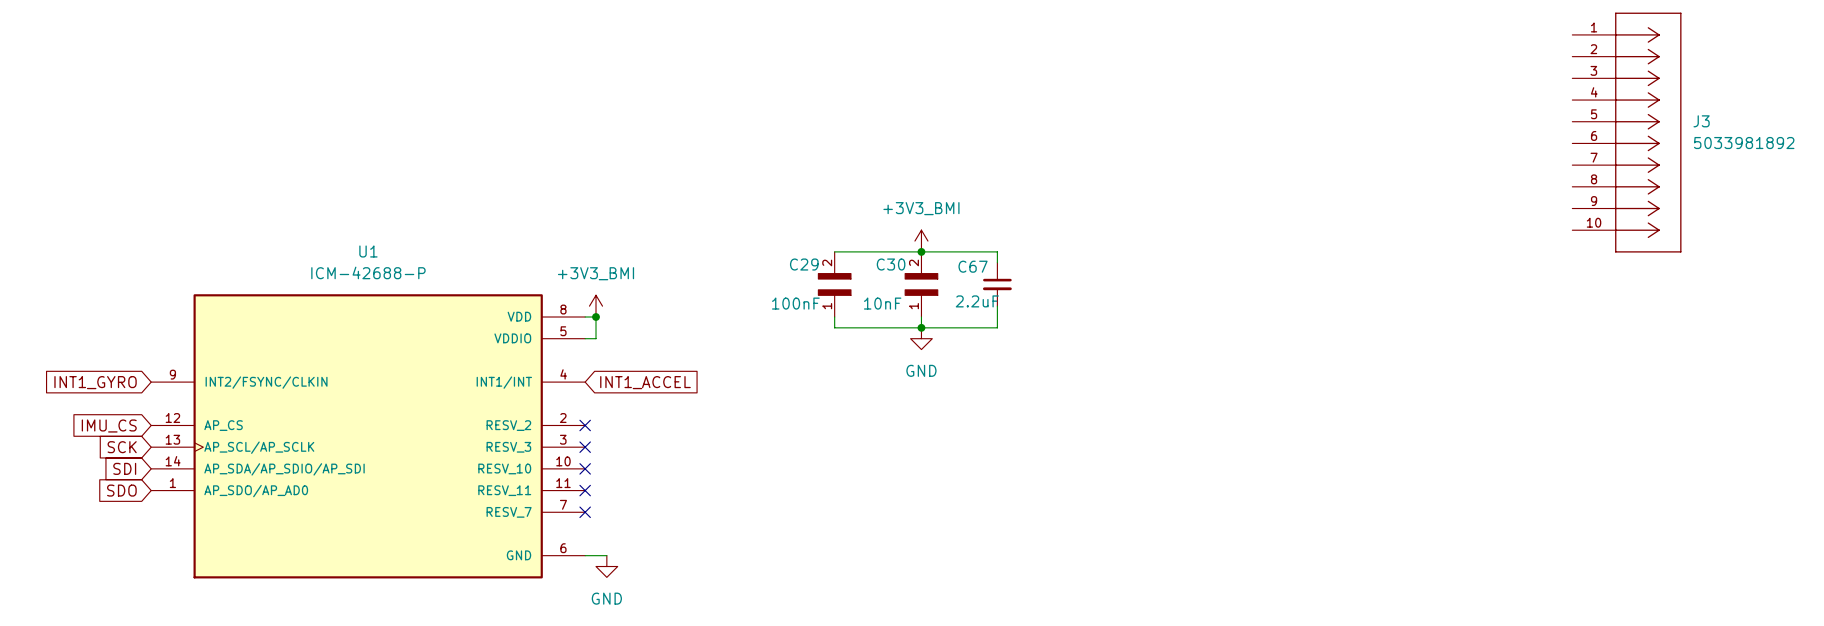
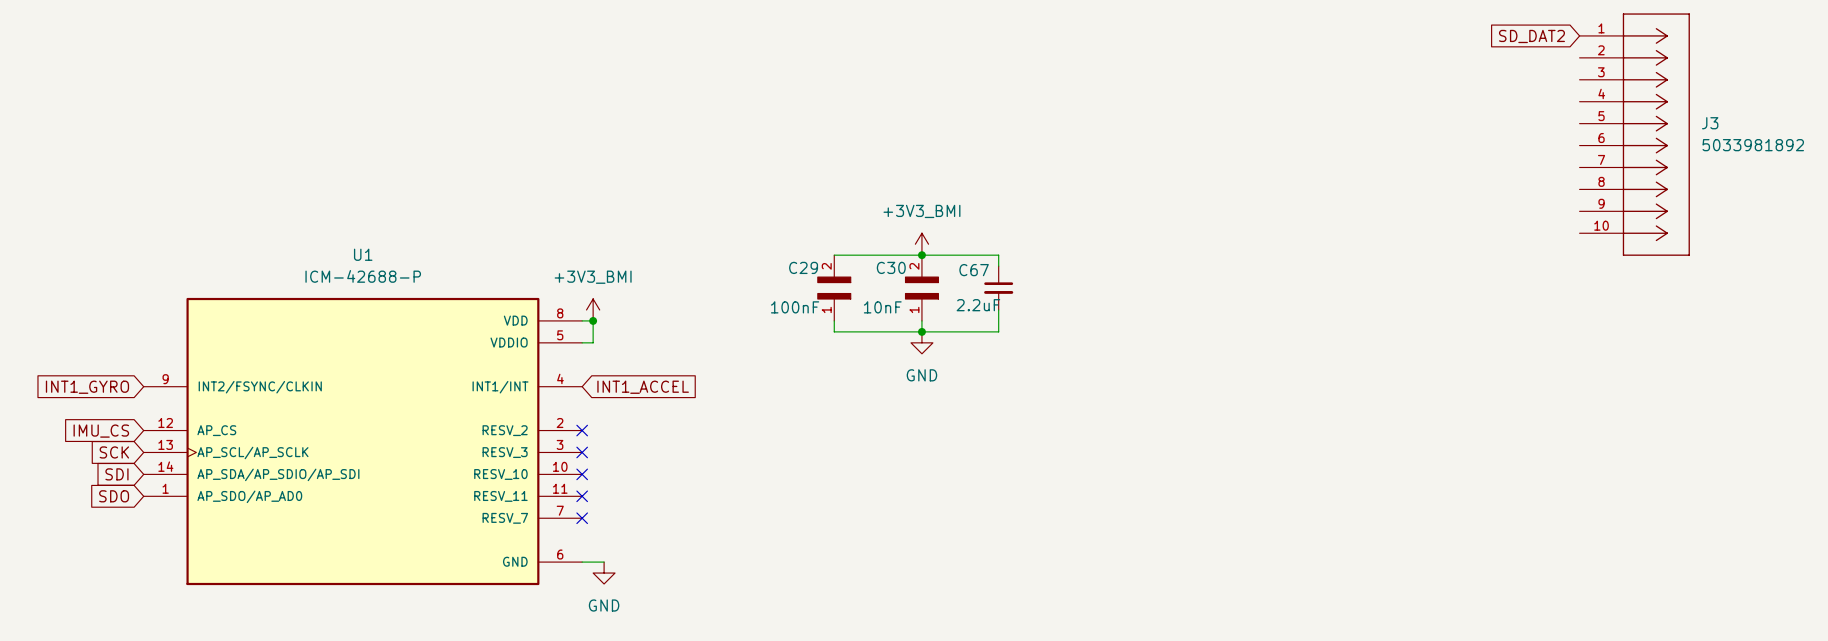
global label: none -> SD_DAT2 (1531, 36)

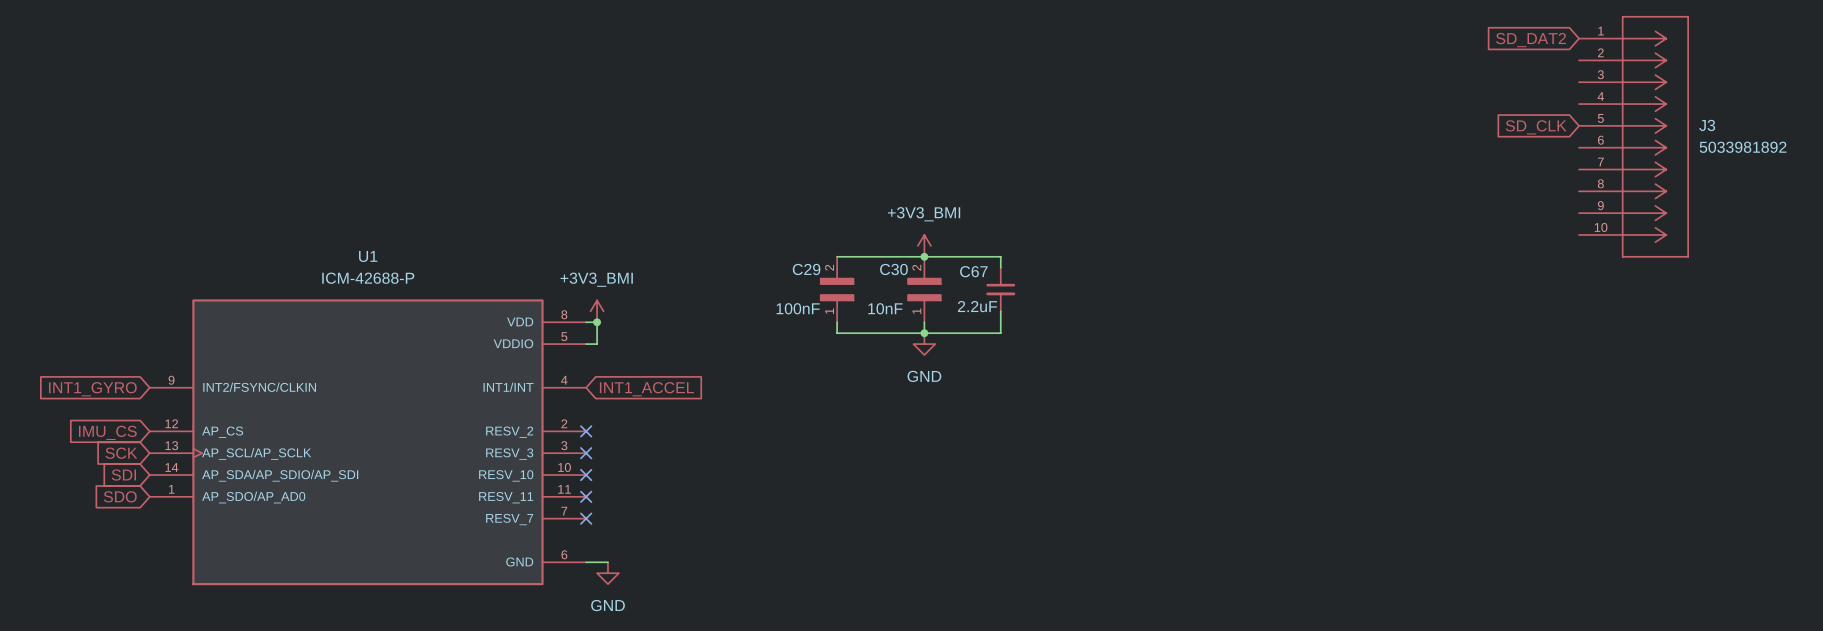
global label: none -> SD_CLK (1536, 127)

